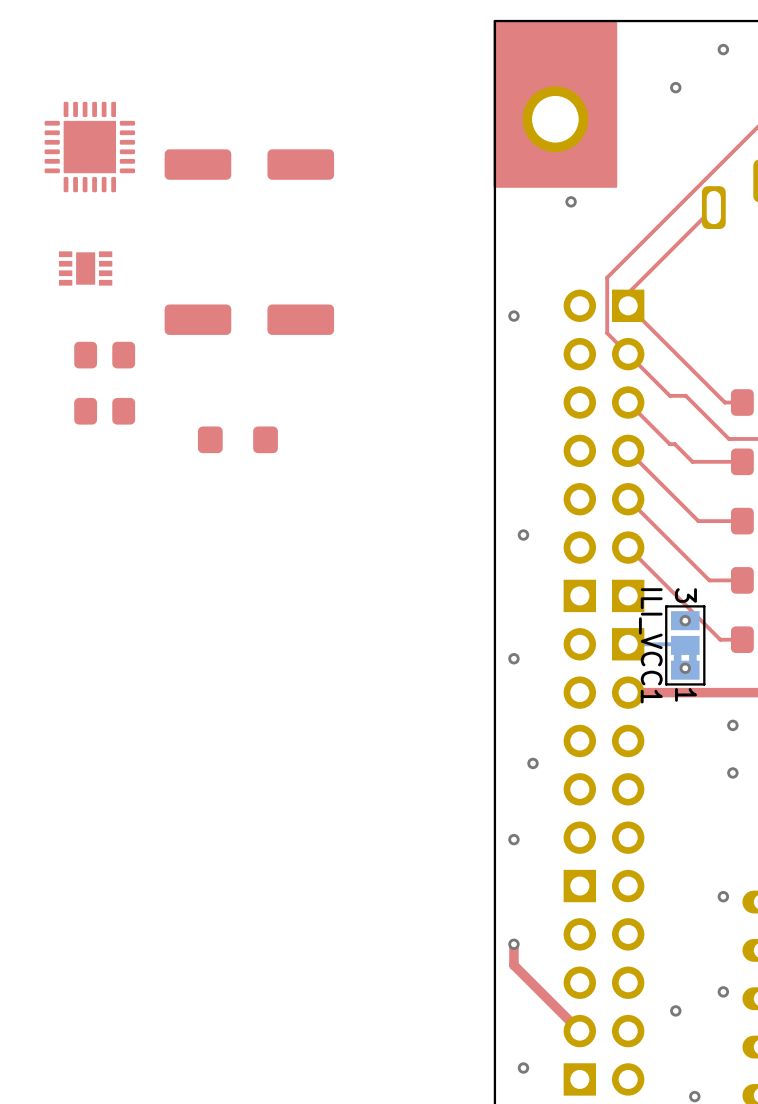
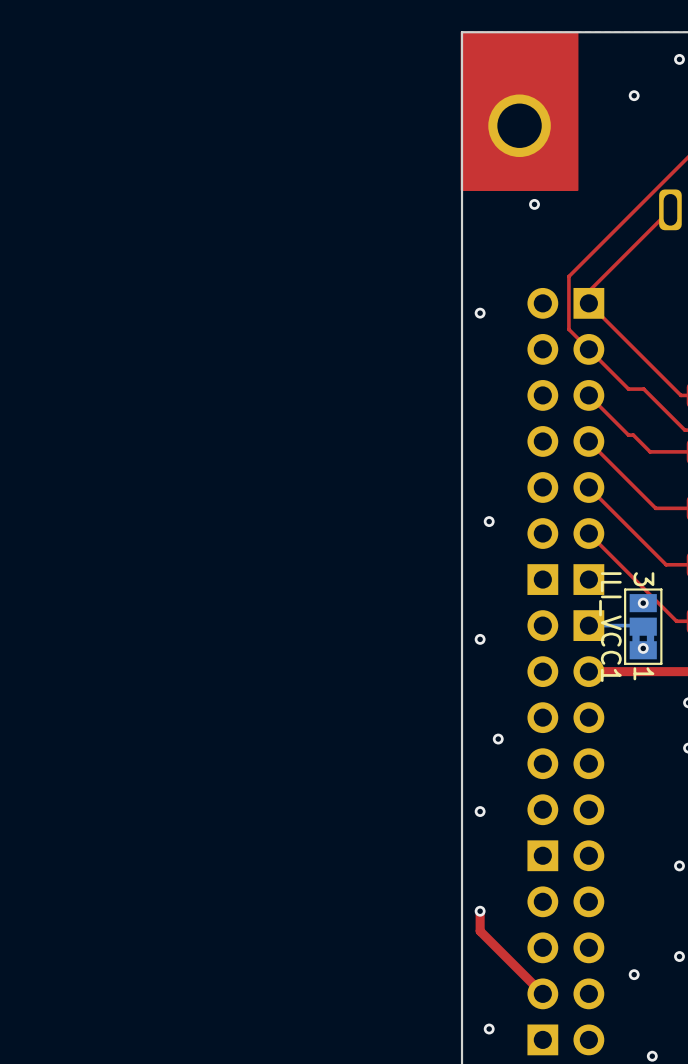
part: (89, 147) -> none
part: (249, 164) -> none
part: (85, 268) -> none
part: (249, 319) -> none
part: (104, 355) -> none
part: (104, 411) -> none
part: (237, 439) -> none

